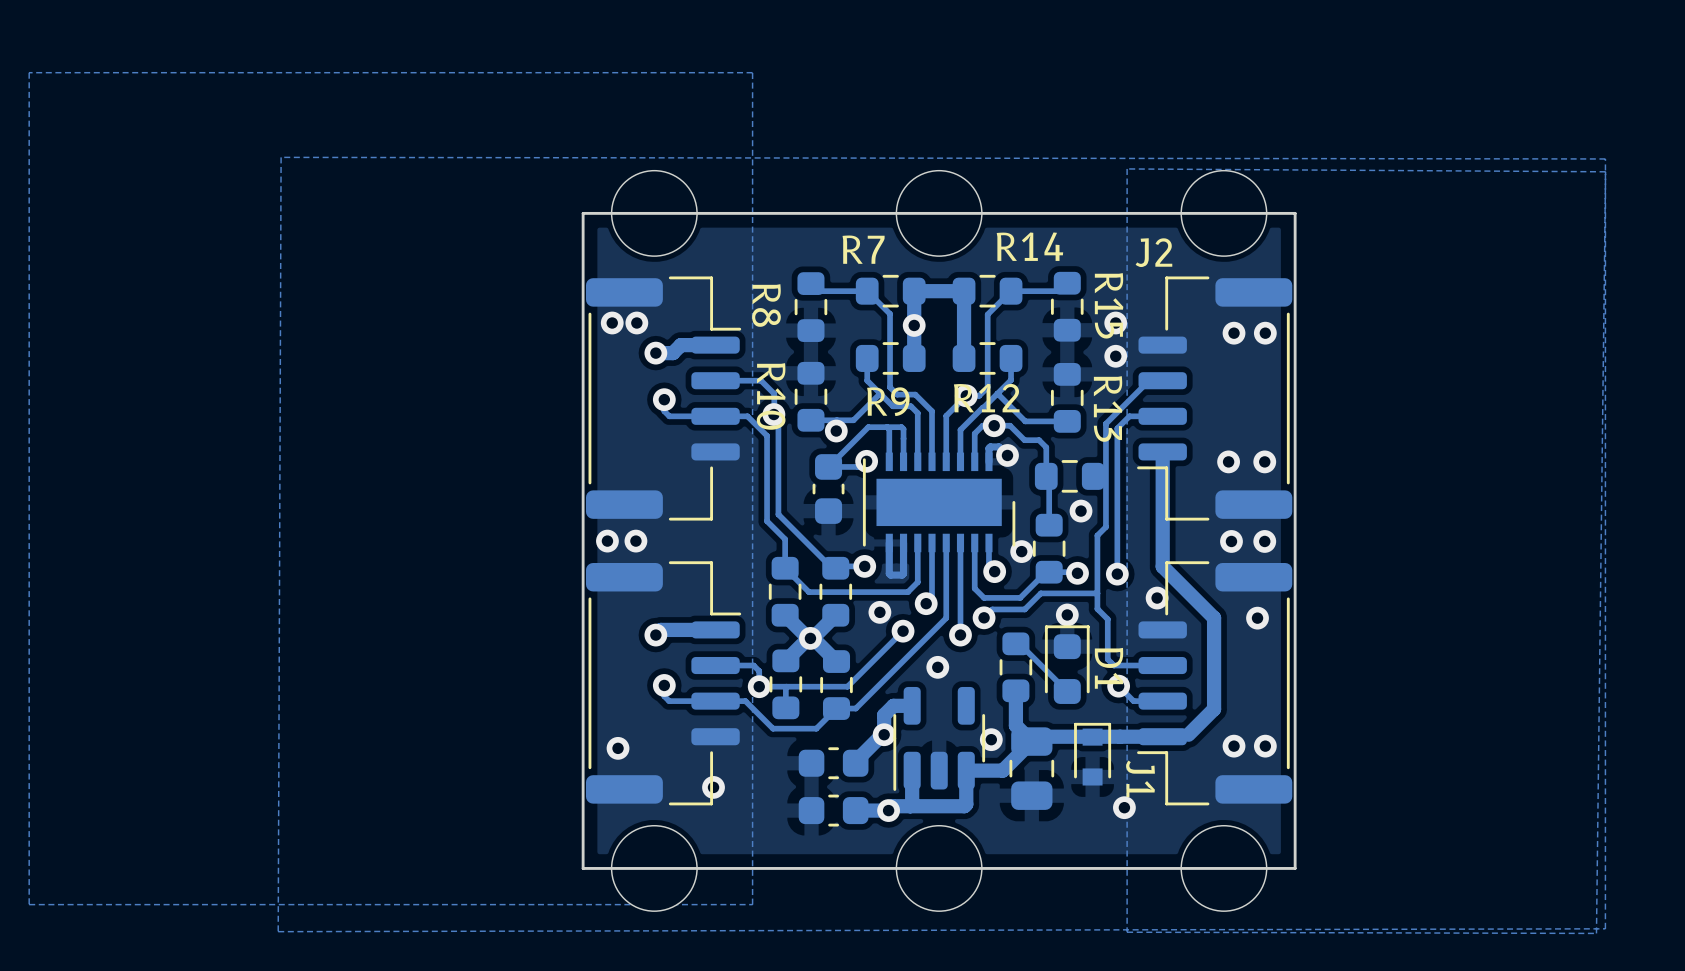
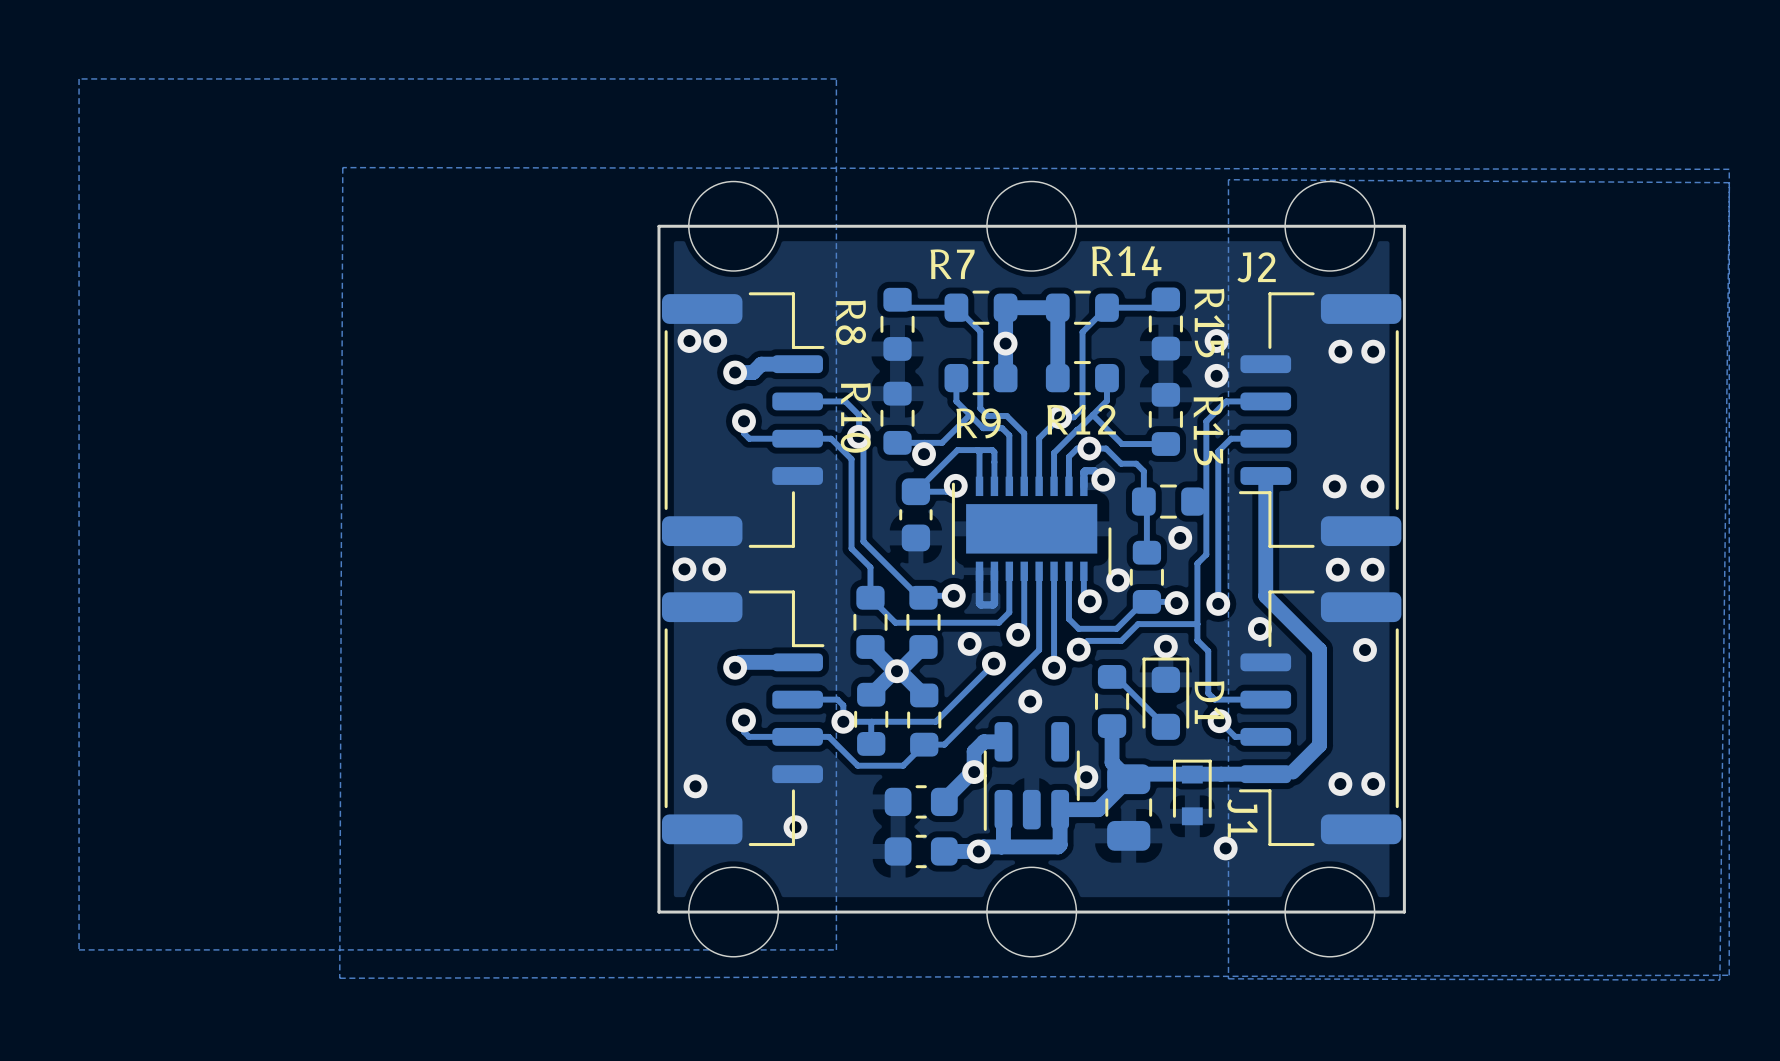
track: (1148, 380) (1105, 423) -> (1250, 401) (1226, 401) (1206, 421) (1206, 446)

